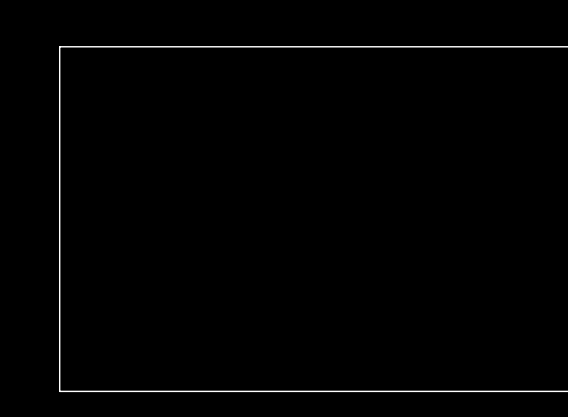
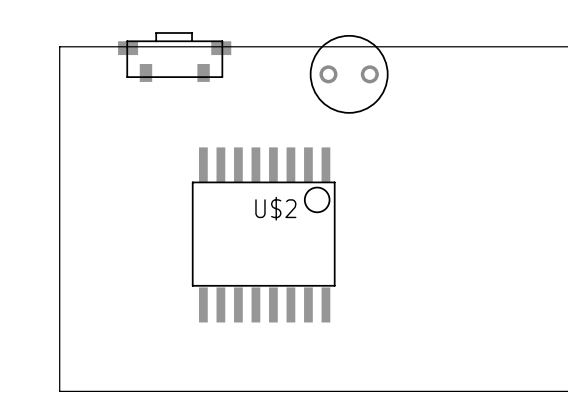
part: none -> (174, 57)
part: none -> (349, 74)
U$2: none -> (263, 234)

